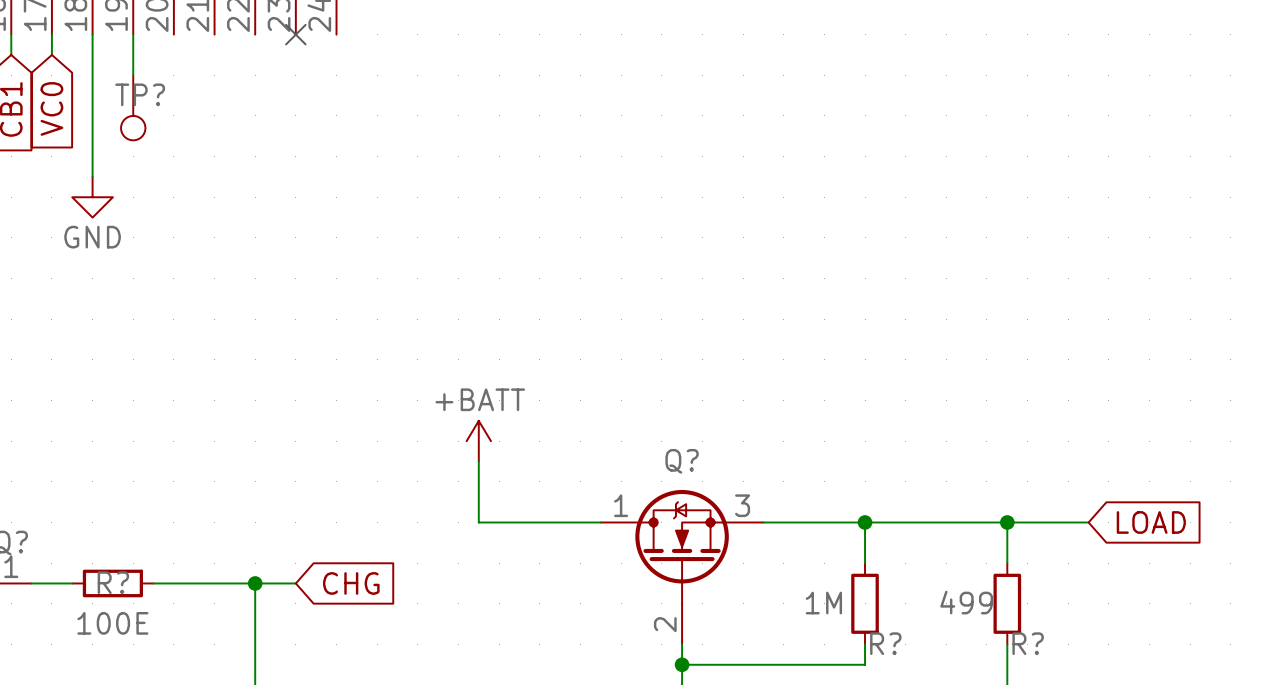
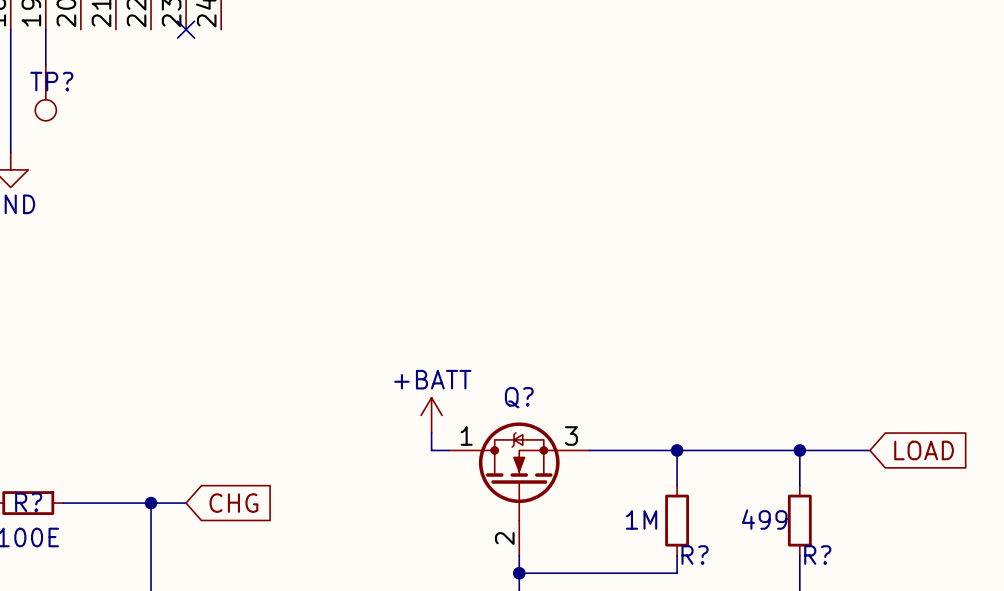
power symbol position: +BATT (478, 441) -> +BATT (431, 415)
wire: (478, 461) (478, 522) (580, 522) -> (431, 432) (431, 450)

